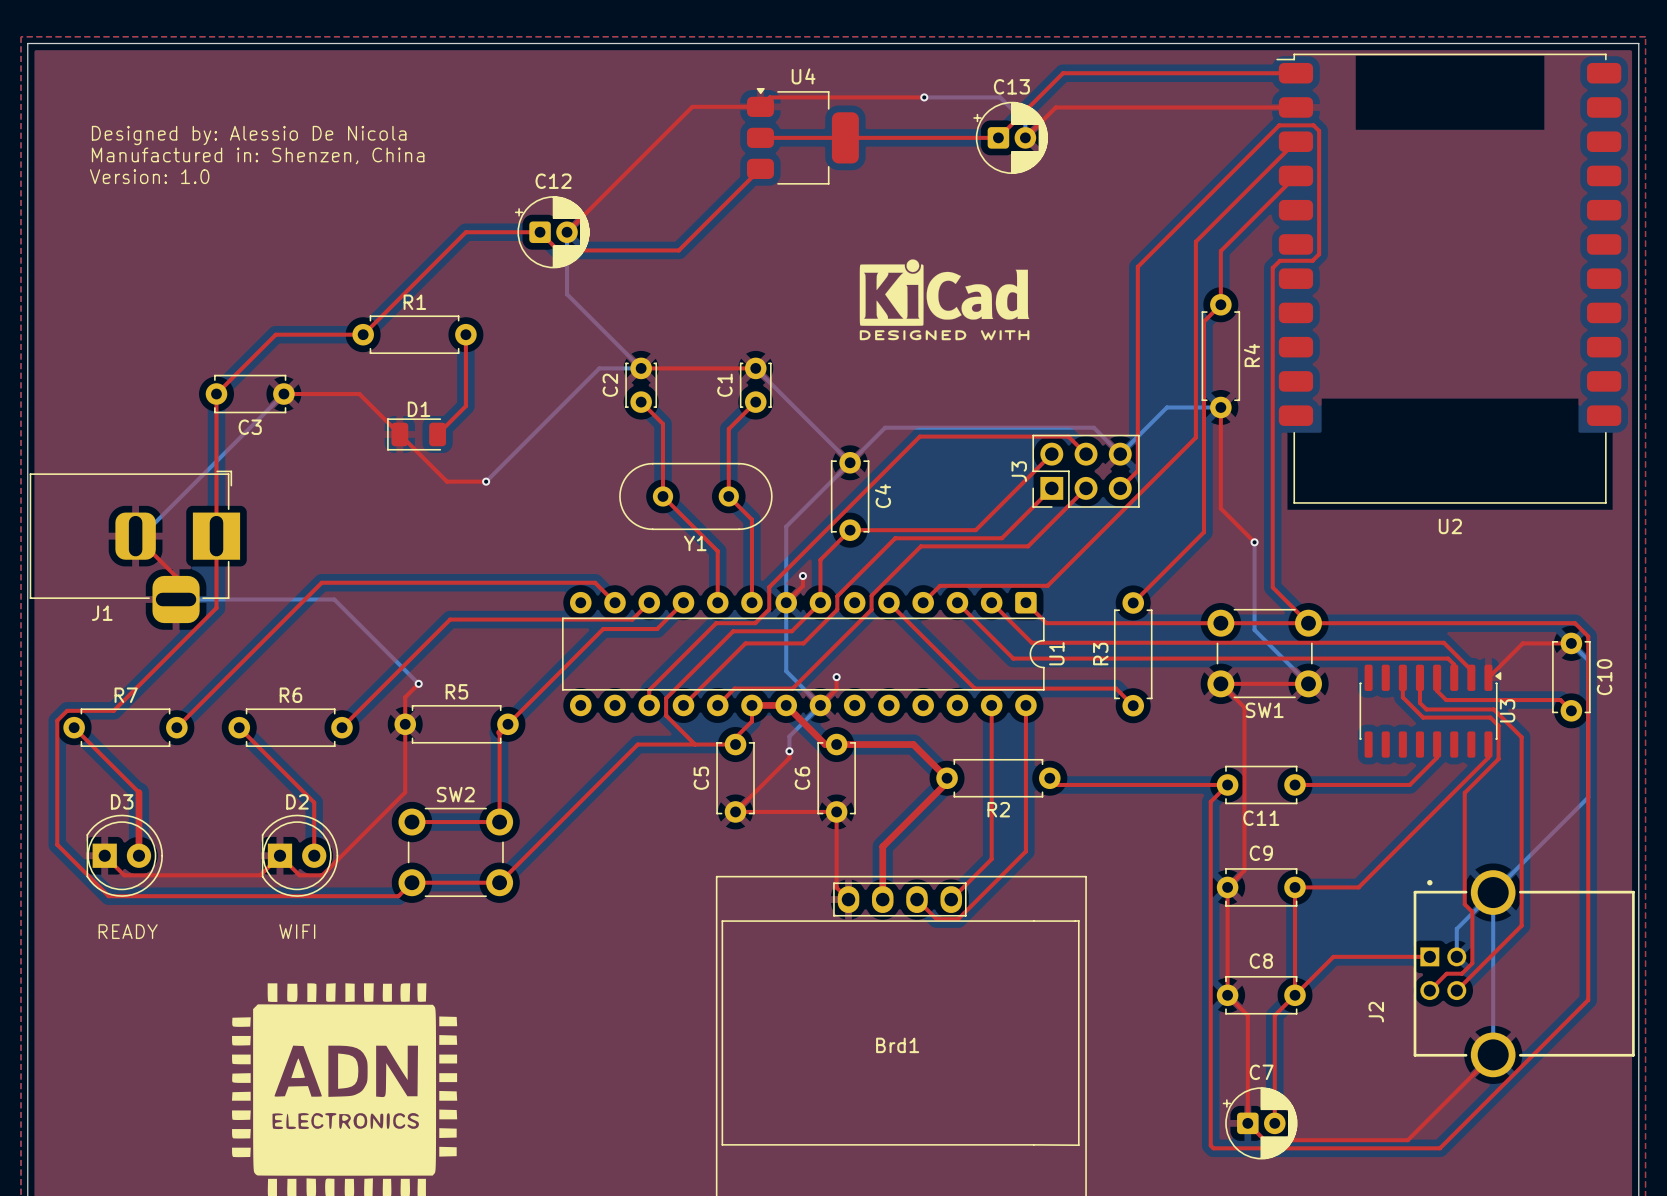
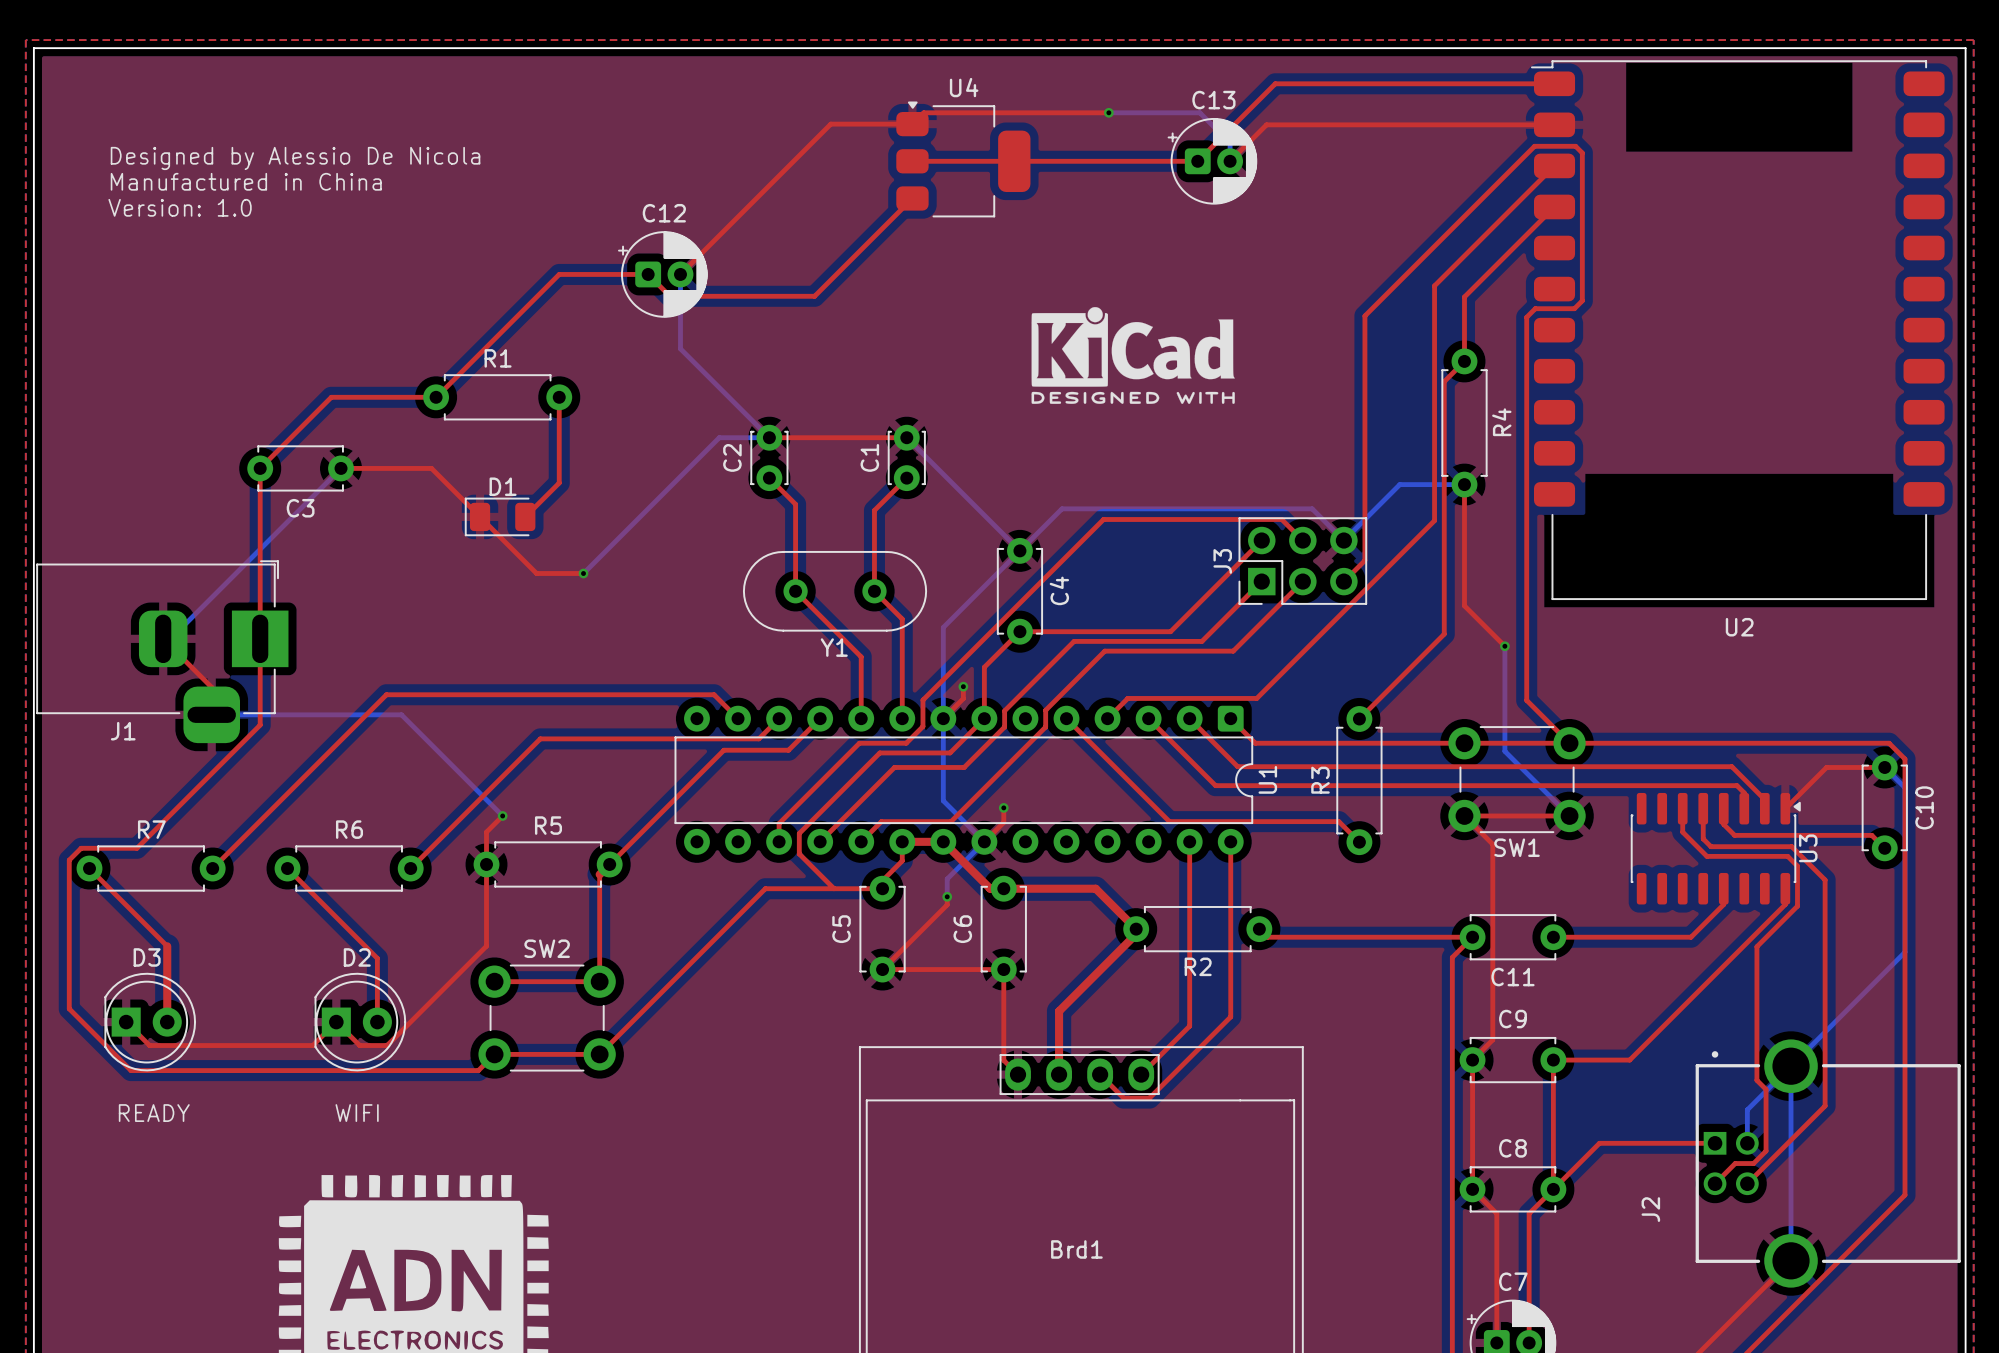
text: Designed by: Alessio De Nicola (249, 135) -> Designed by Alessio De Nicola (295, 158)
text: Manufactured in: Shenzen, China (258, 155) -> Manufactured in China (246, 181)

